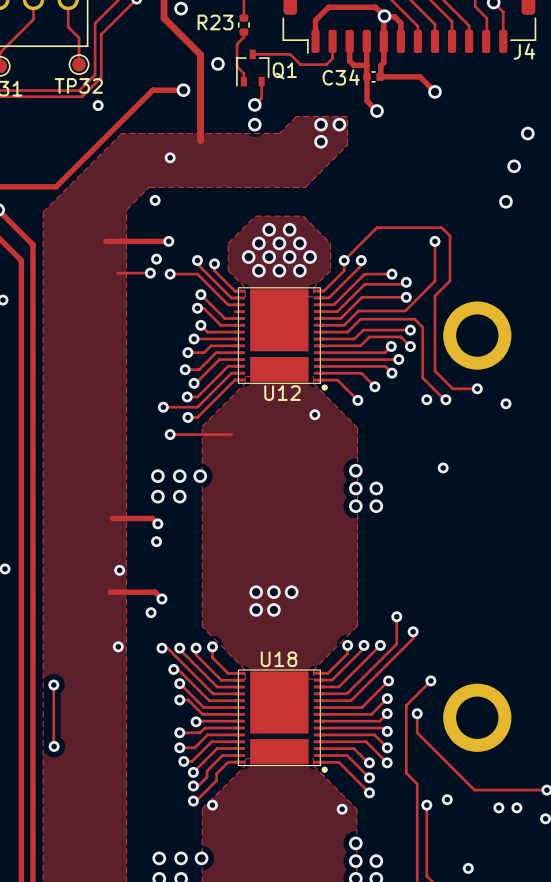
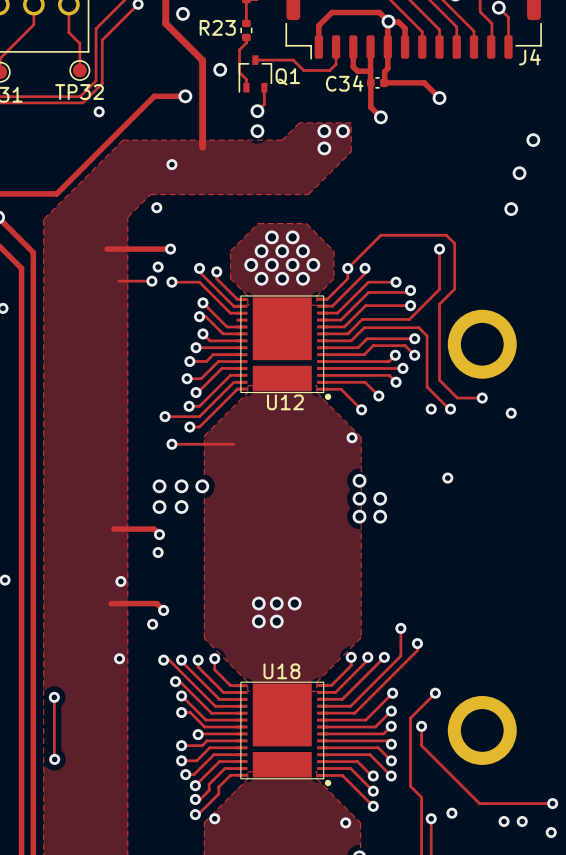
via position: (314, 414) -> (352, 437)

